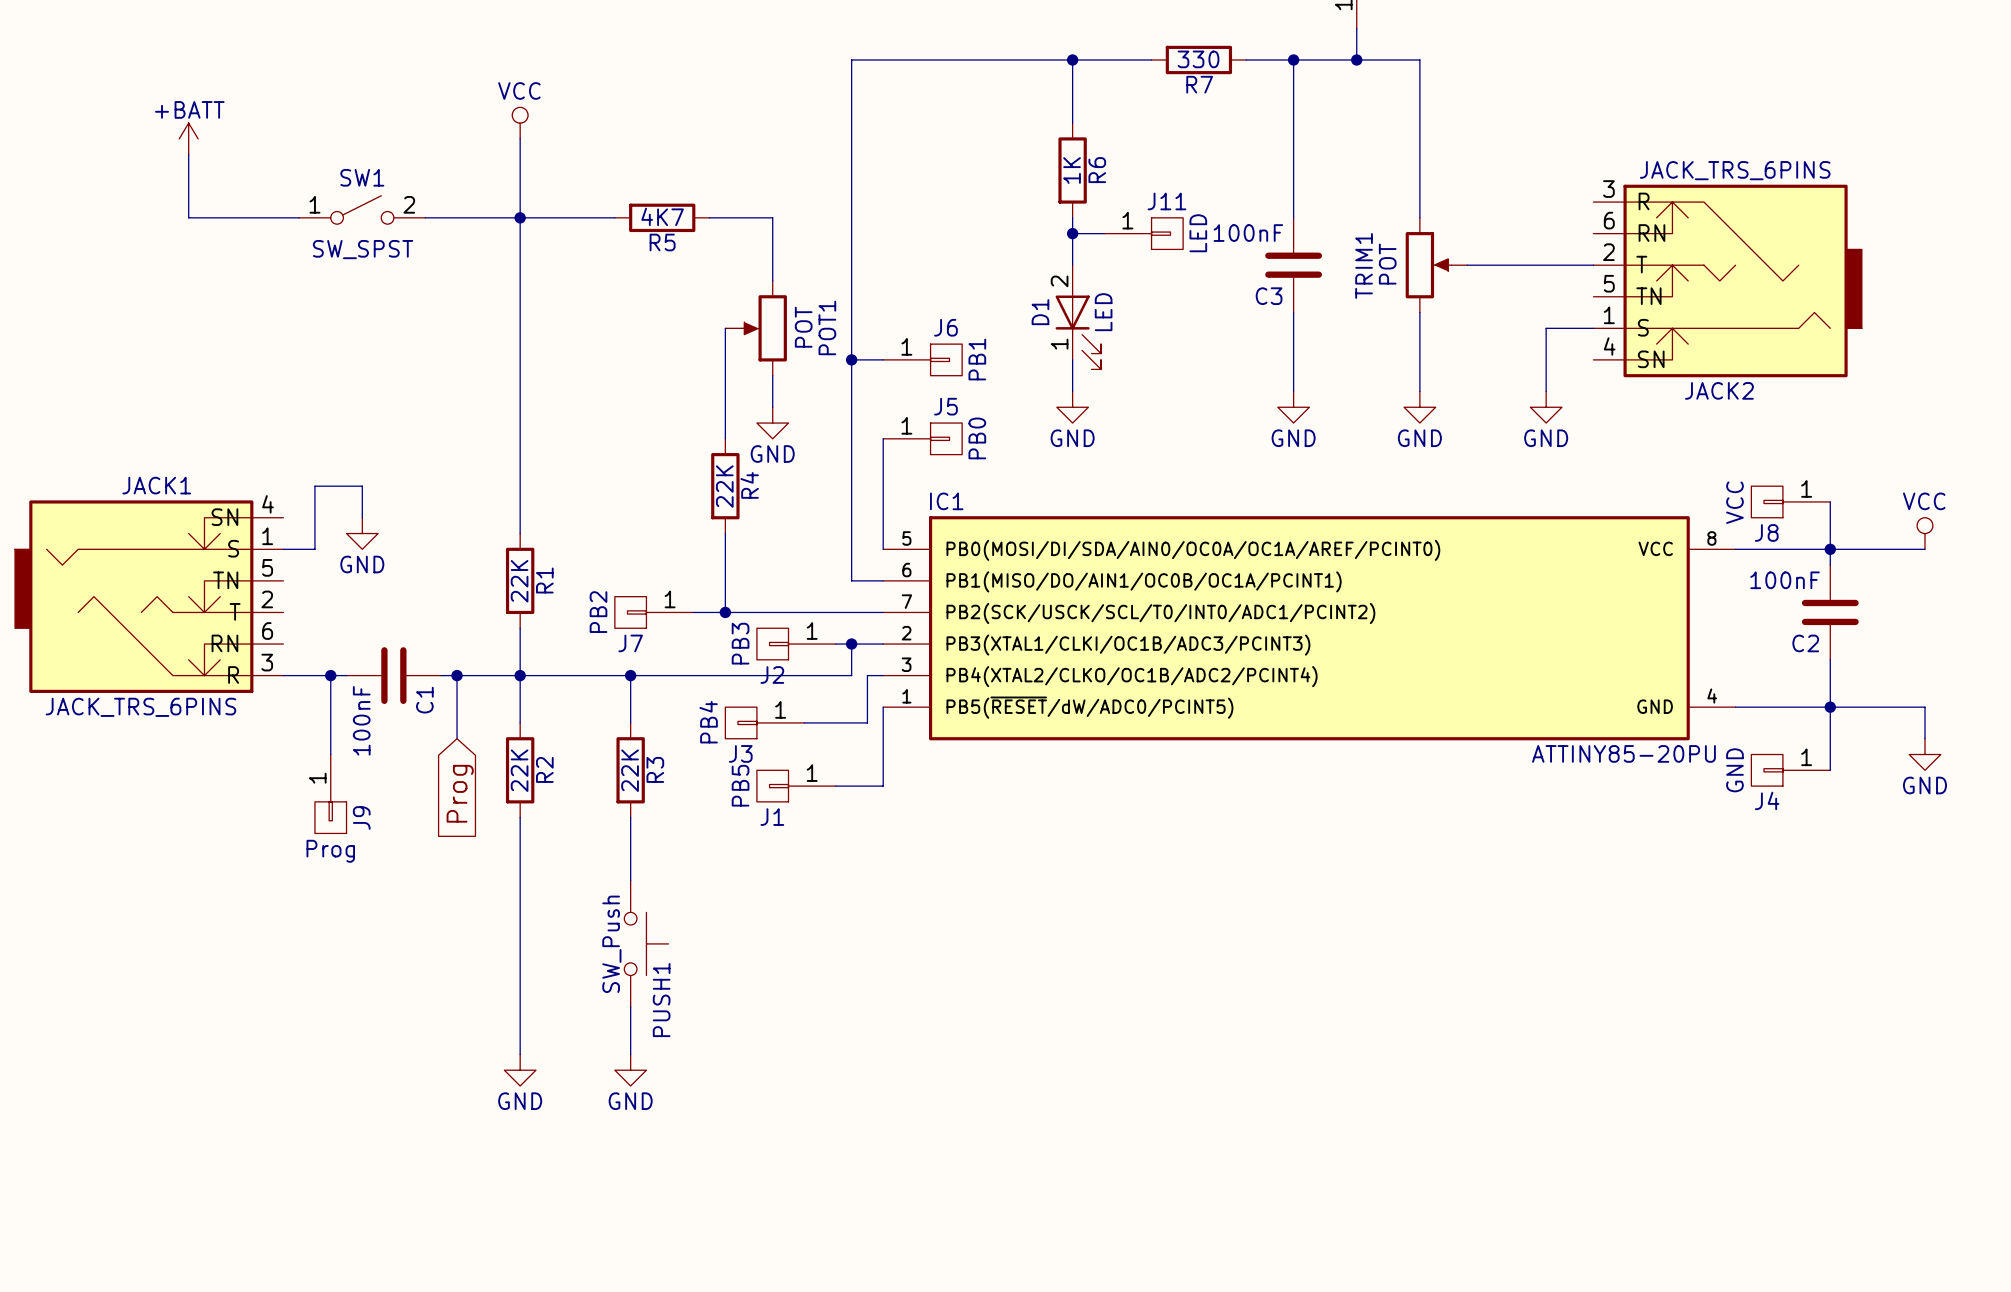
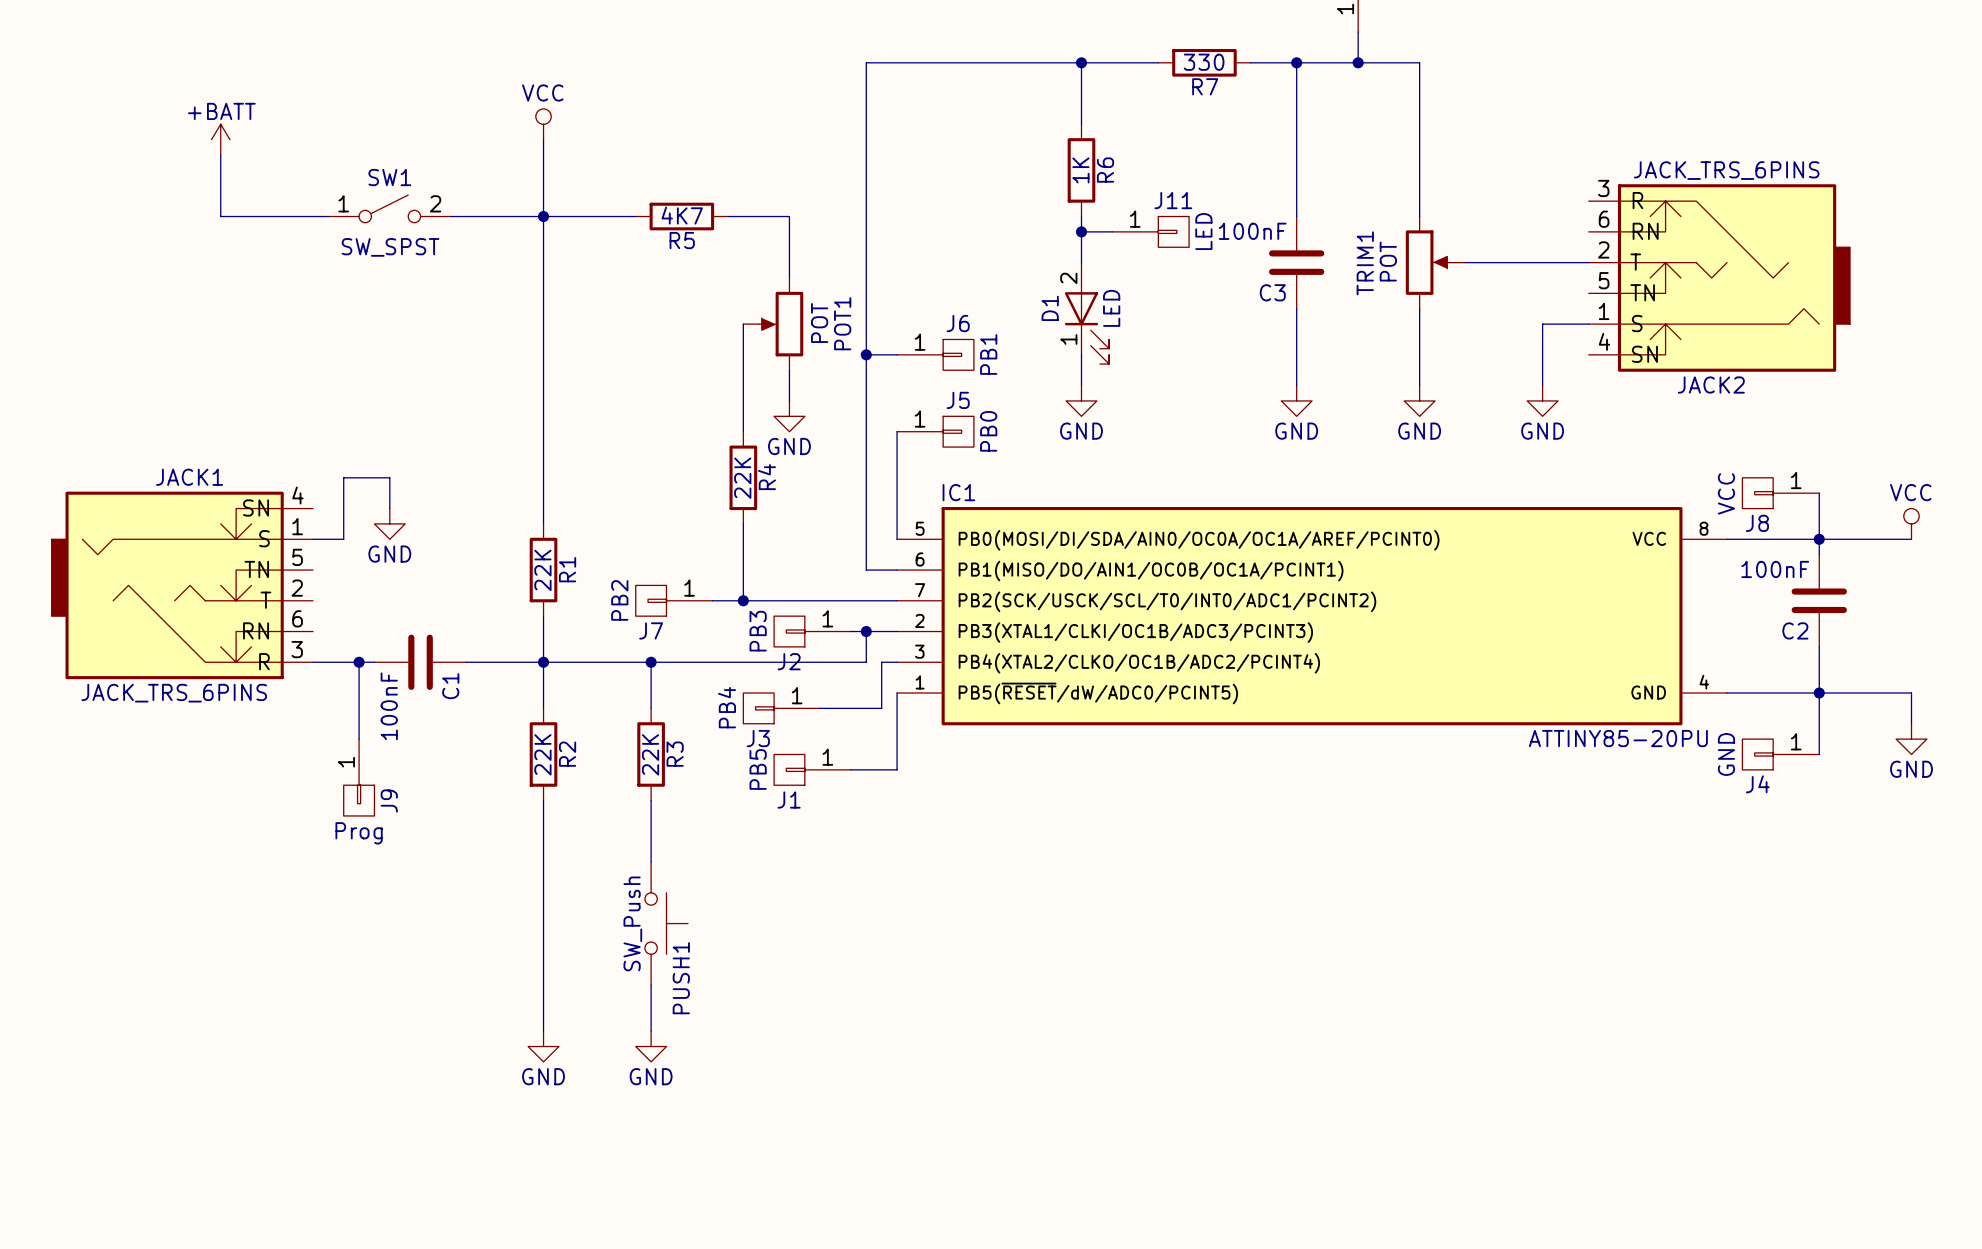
wire: (457, 675) (457, 738) -> none
junction: (457, 675) -> none
global label: Prog (460, 793) -> none

